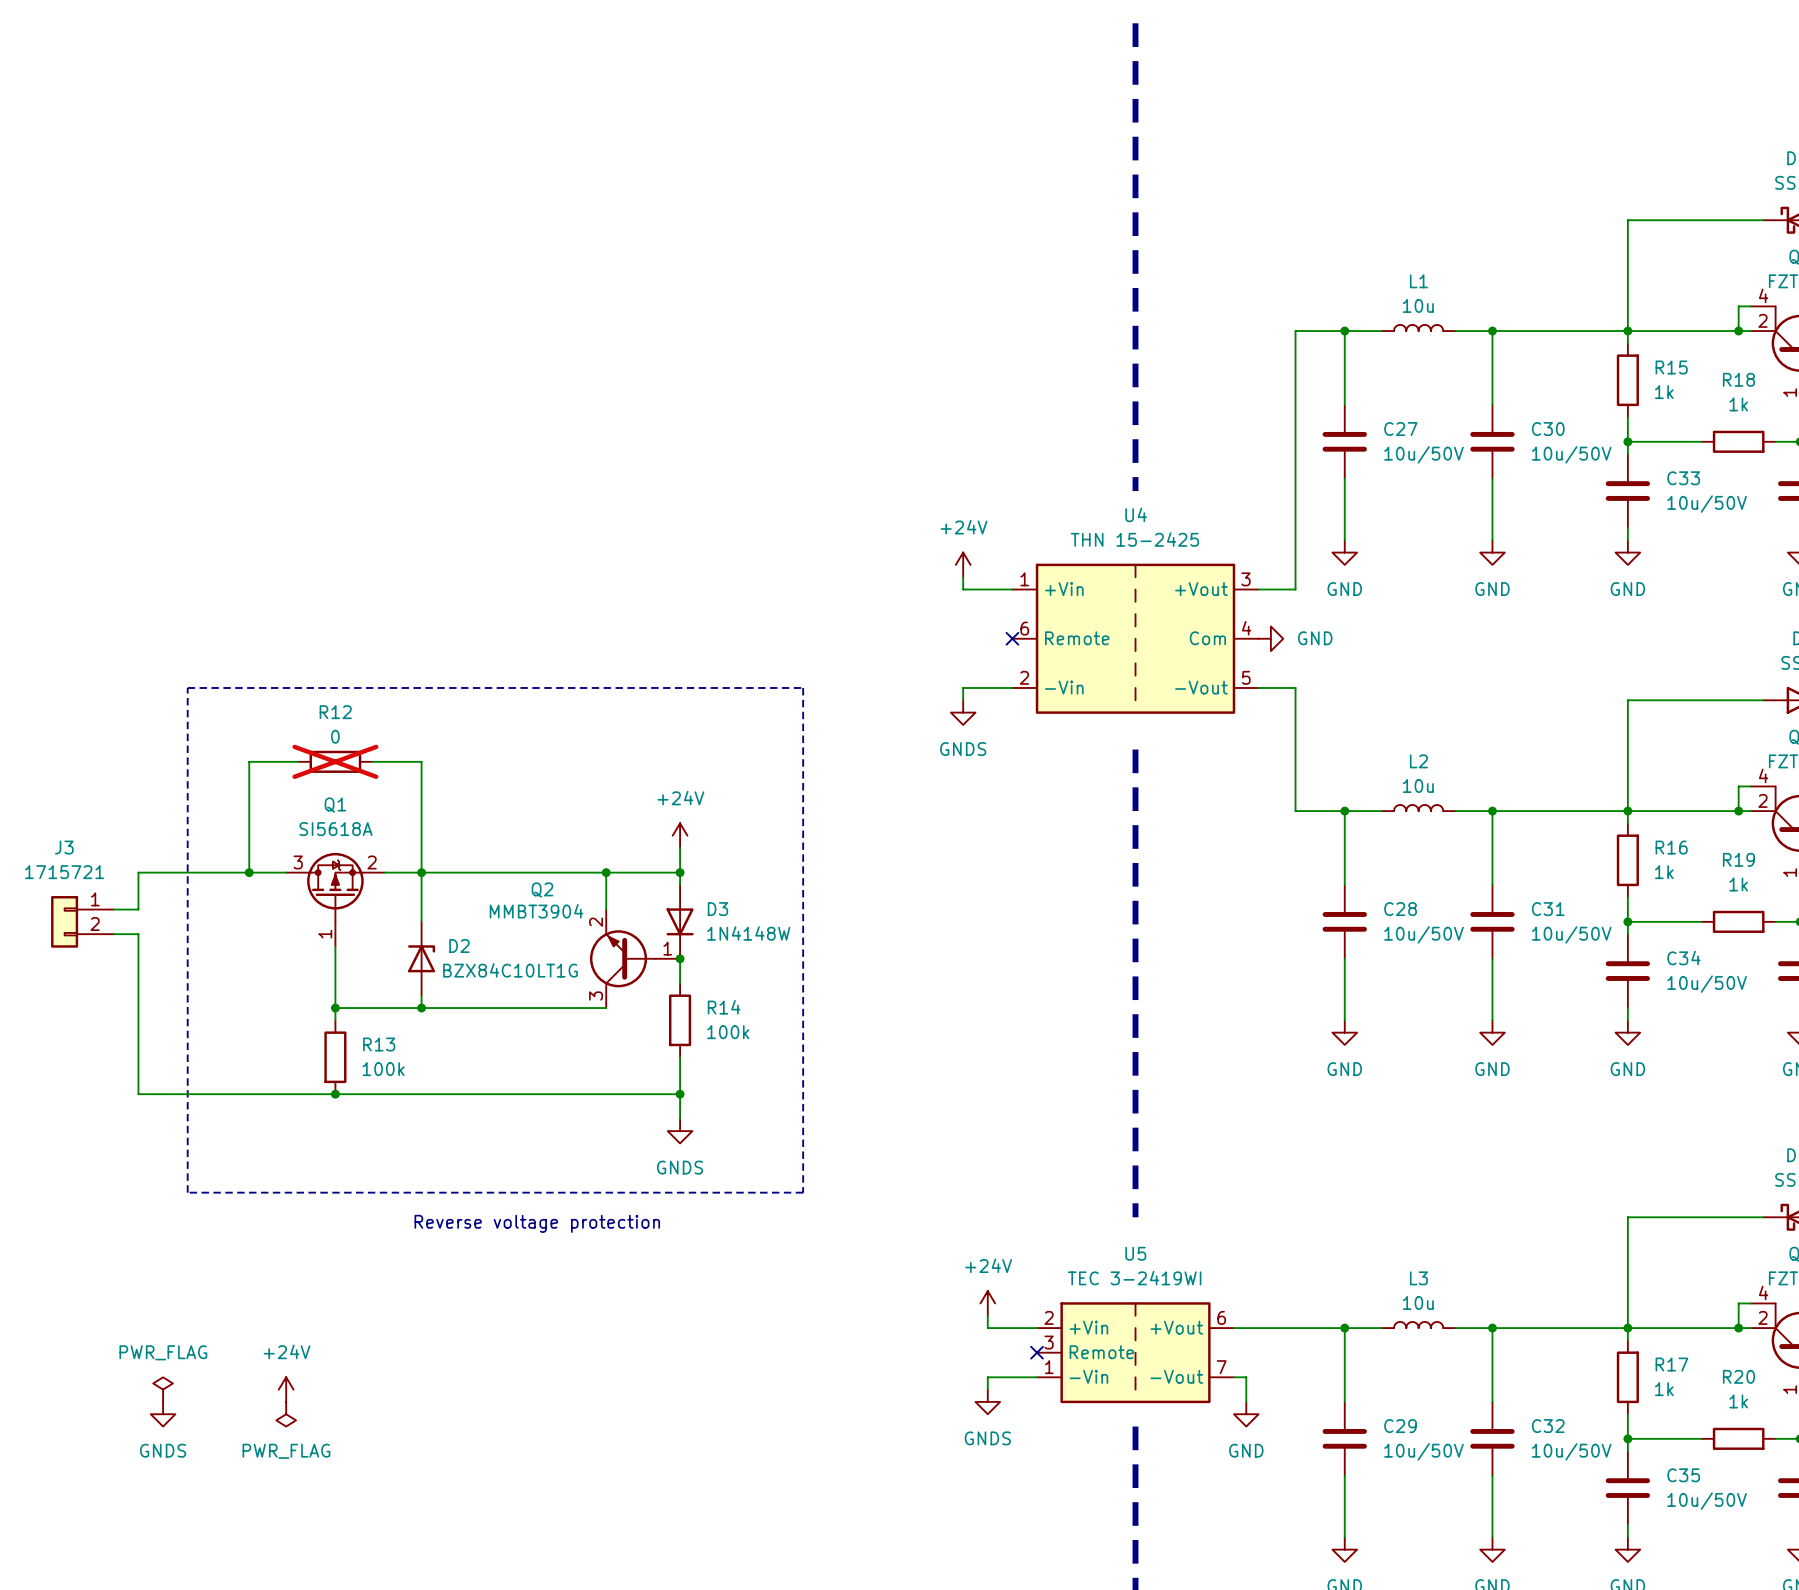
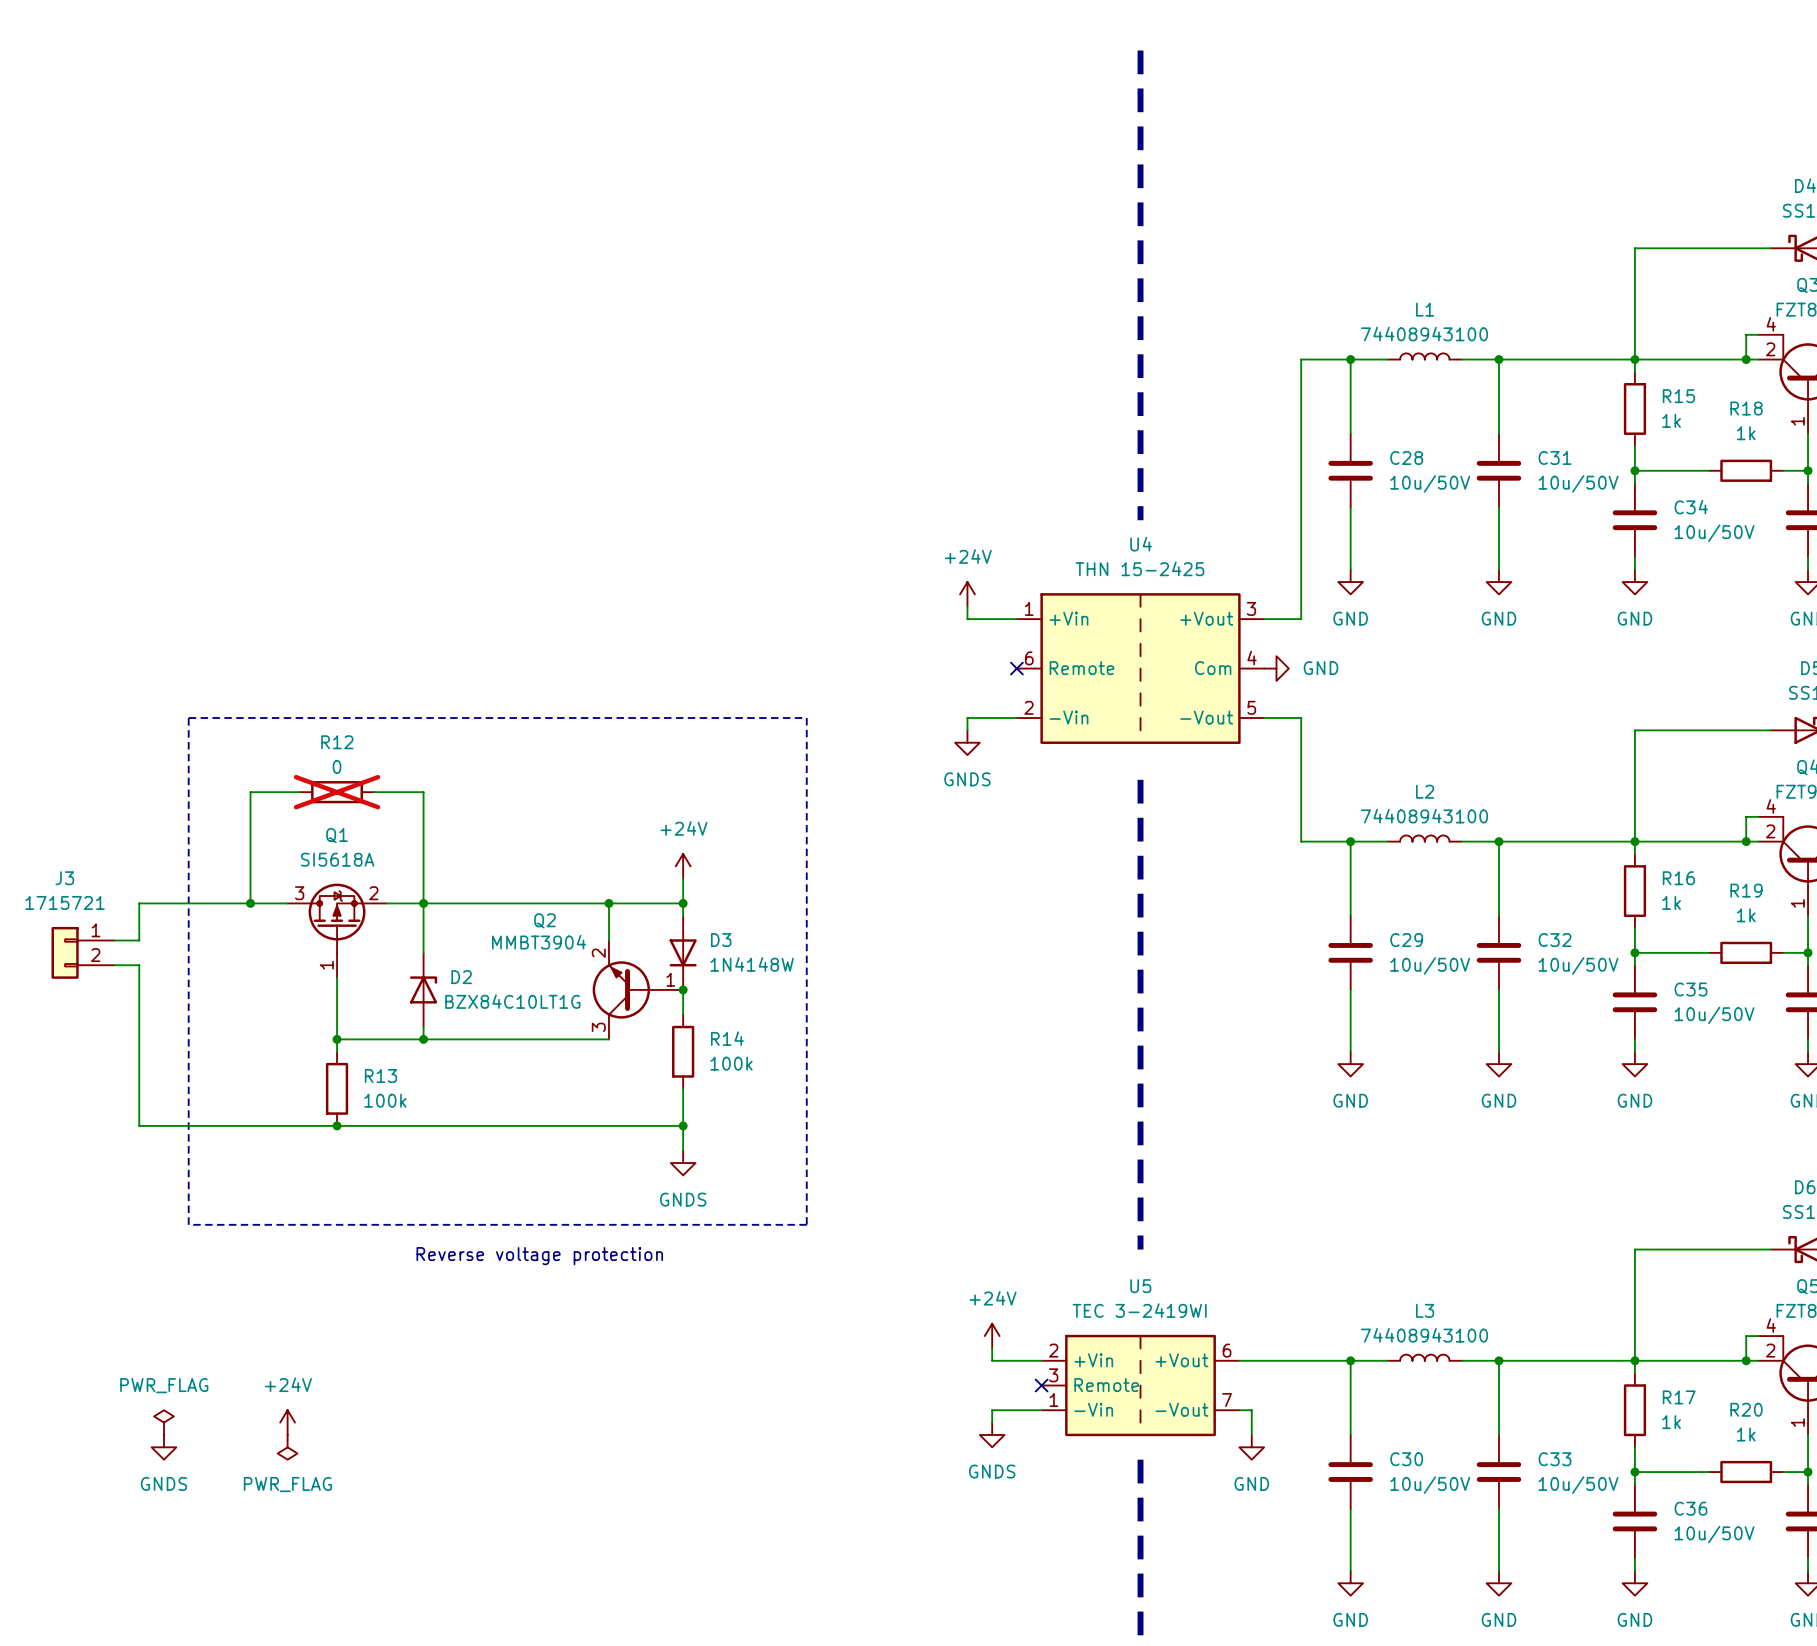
L1 value: 10u (1418, 305) -> 74408943100 (1424, 334)
C27 name: C27 (1400, 429) -> C28 (1406, 457)
C30 name: C30 (1548, 429) -> C31 (1555, 457)
C33 name: C33 (1683, 478) -> C34 (1691, 507)
L2 value: 10u (1418, 786) -> 74408943100 (1424, 816)
C28 name: C28 (1400, 909) -> C29 (1406, 940)
C31 name: C31 (1548, 909) -> C32 (1555, 940)
C34 name: C34 (1683, 958) -> C35 (1690, 989)
L3 value: 10u (1418, 1302) -> 74408943100 (1424, 1335)
C29 name: C29 (1400, 1426) -> C30 (1406, 1459)
C32 name: C32 (1548, 1426) -> C33 (1555, 1459)
C35 name: C35 (1683, 1475) -> C36 (1690, 1508)

